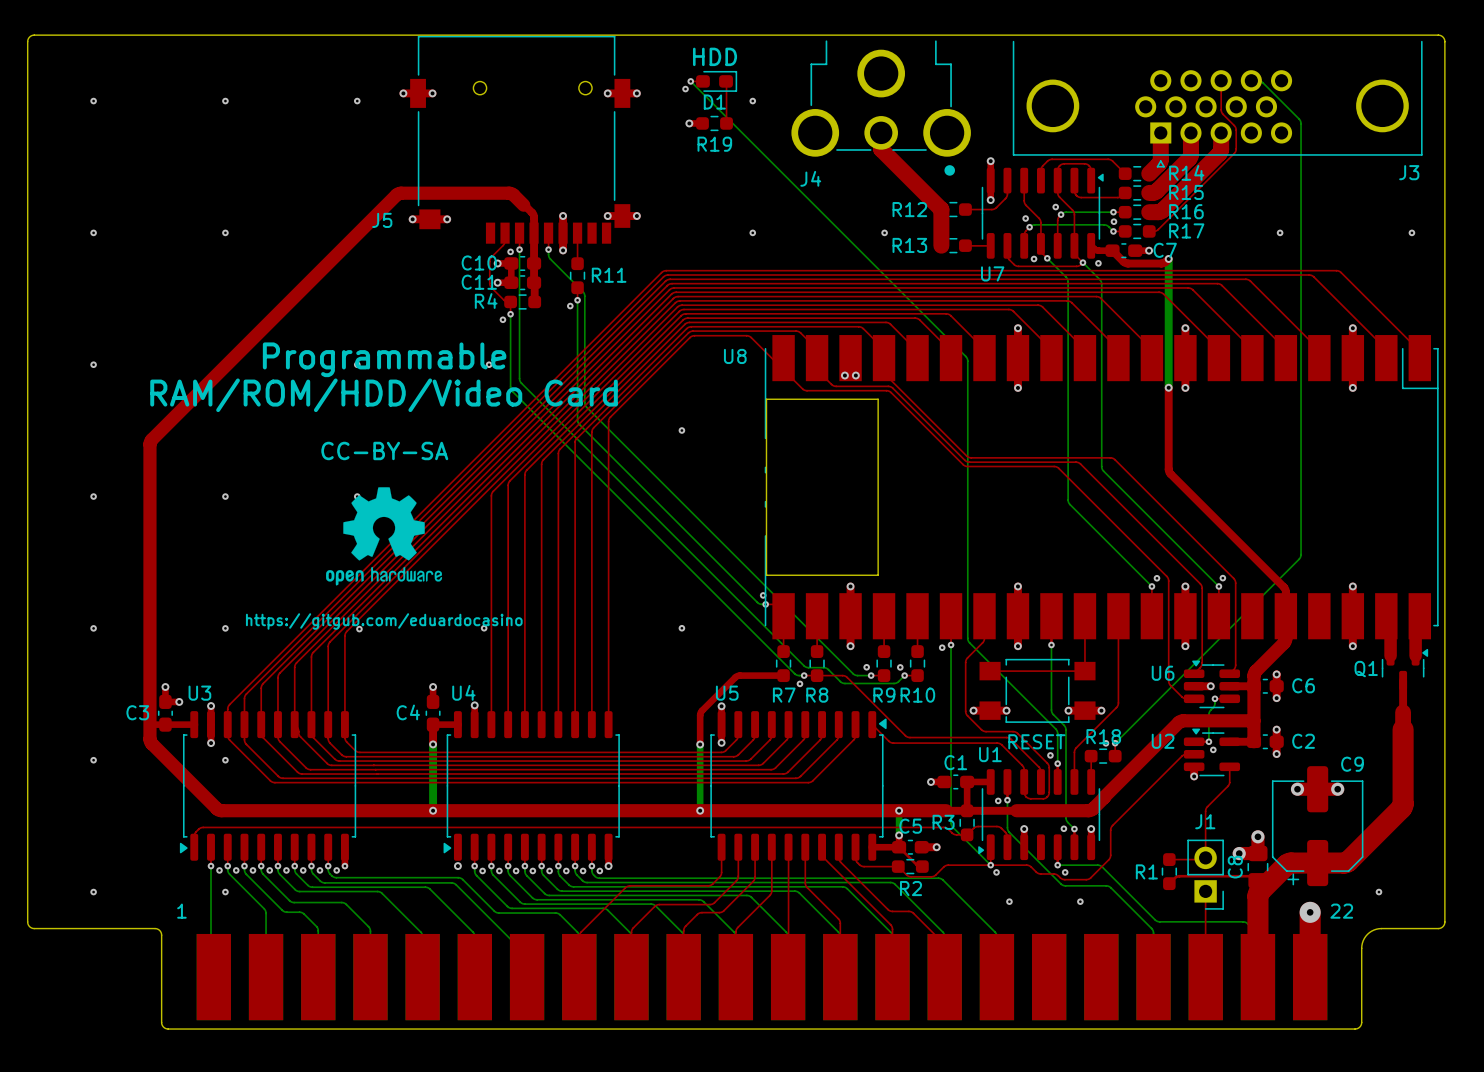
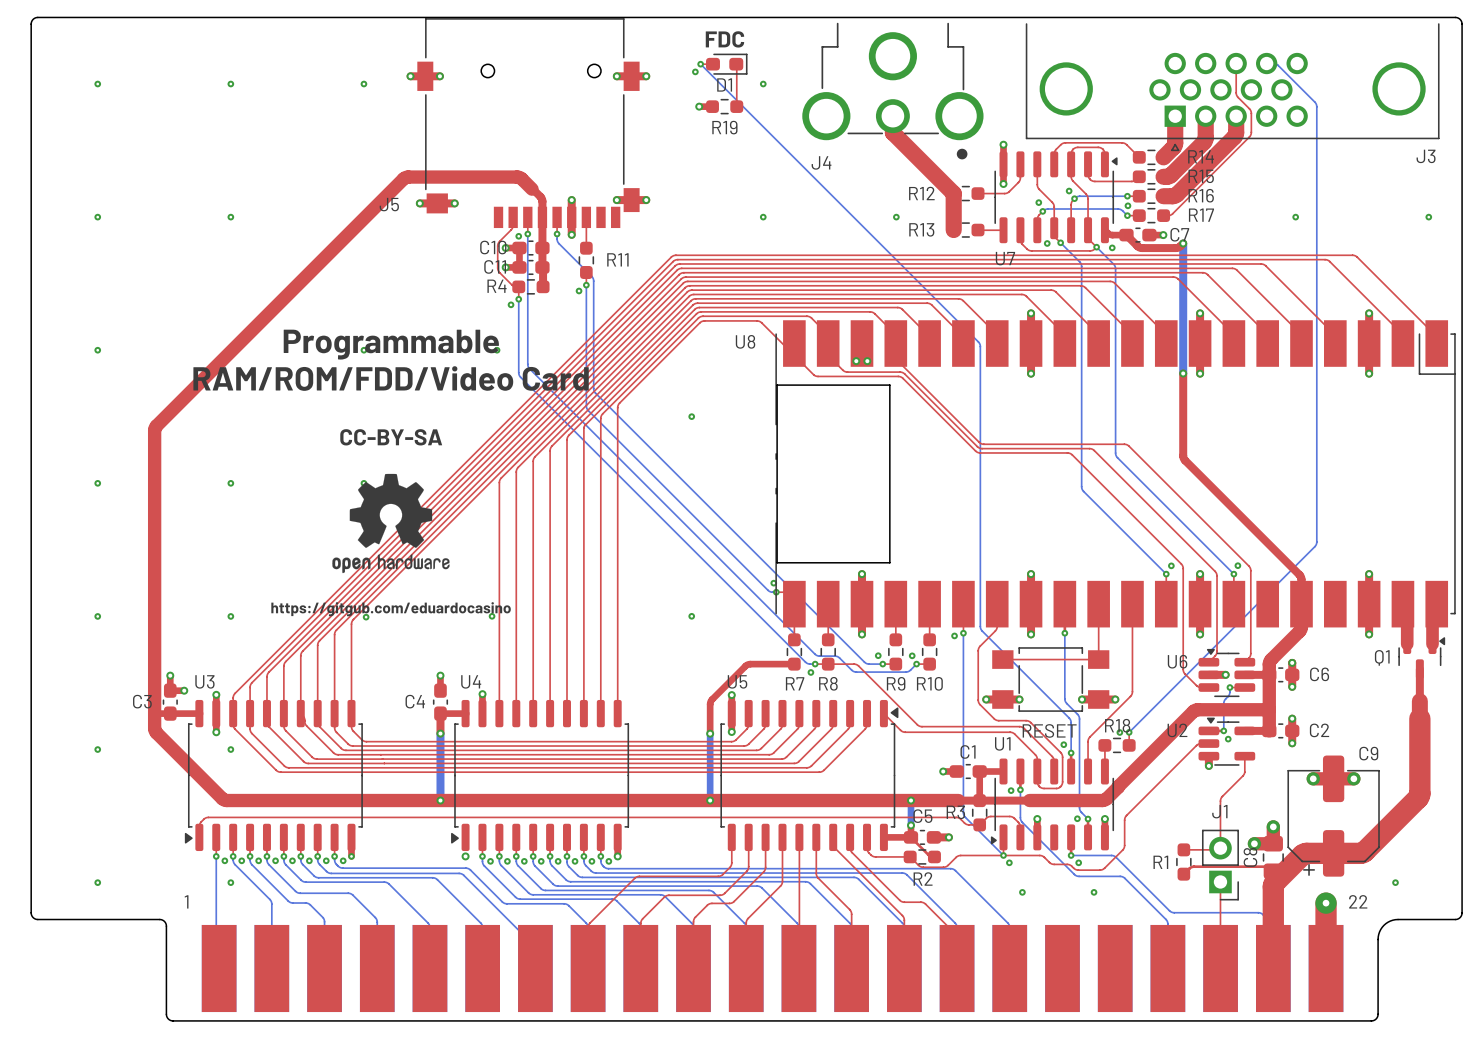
D1 value: HDD (715, 56) -> FDC (724, 39)
text: RAM/ROM/HDD/Video Card (384, 395) -> RAM/ROM/FDD/Video Card (391, 378)

